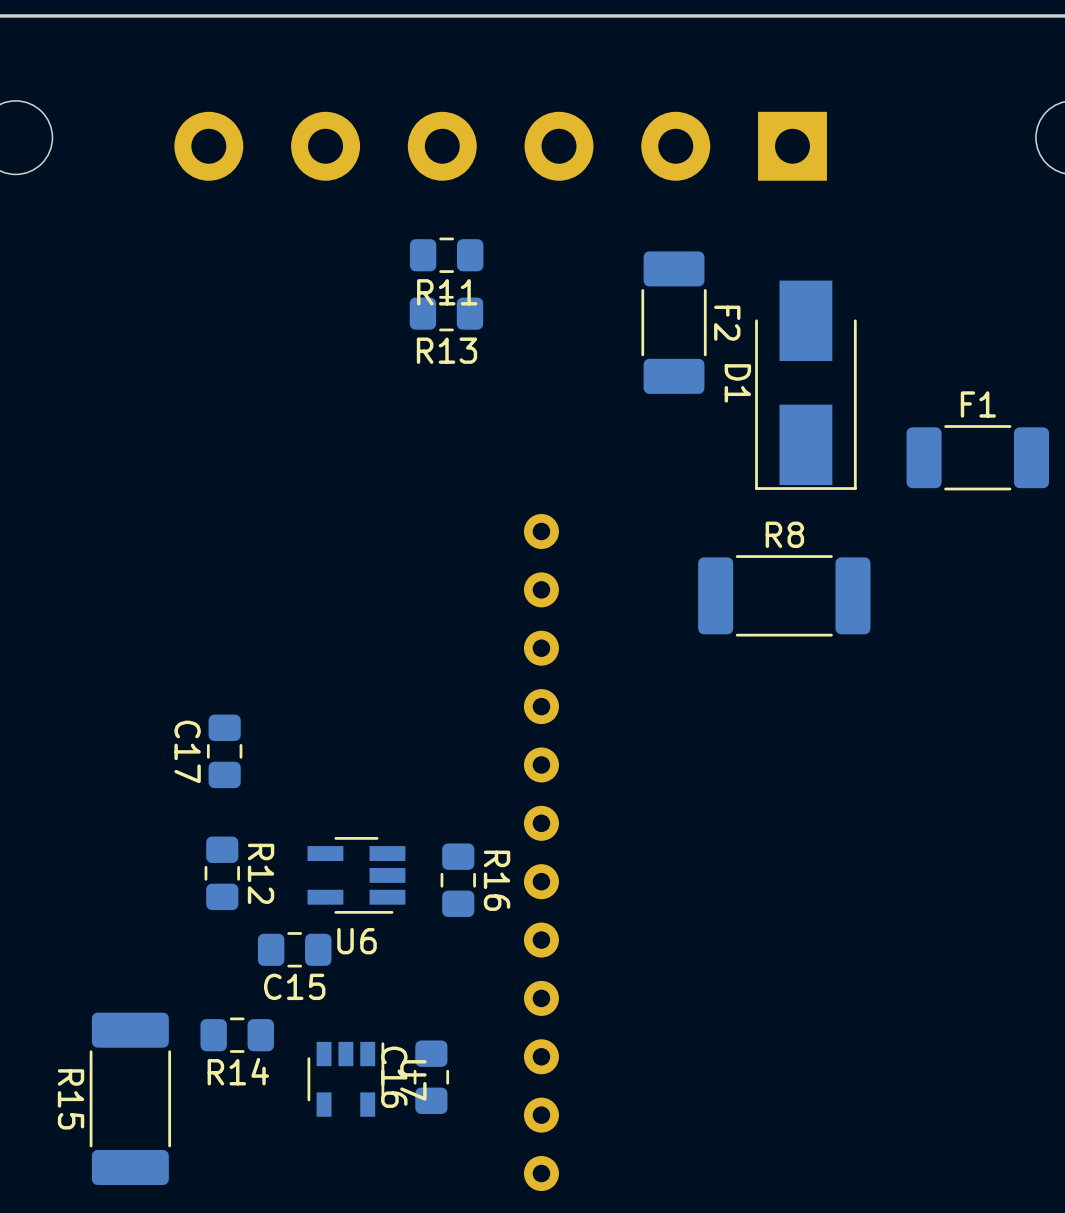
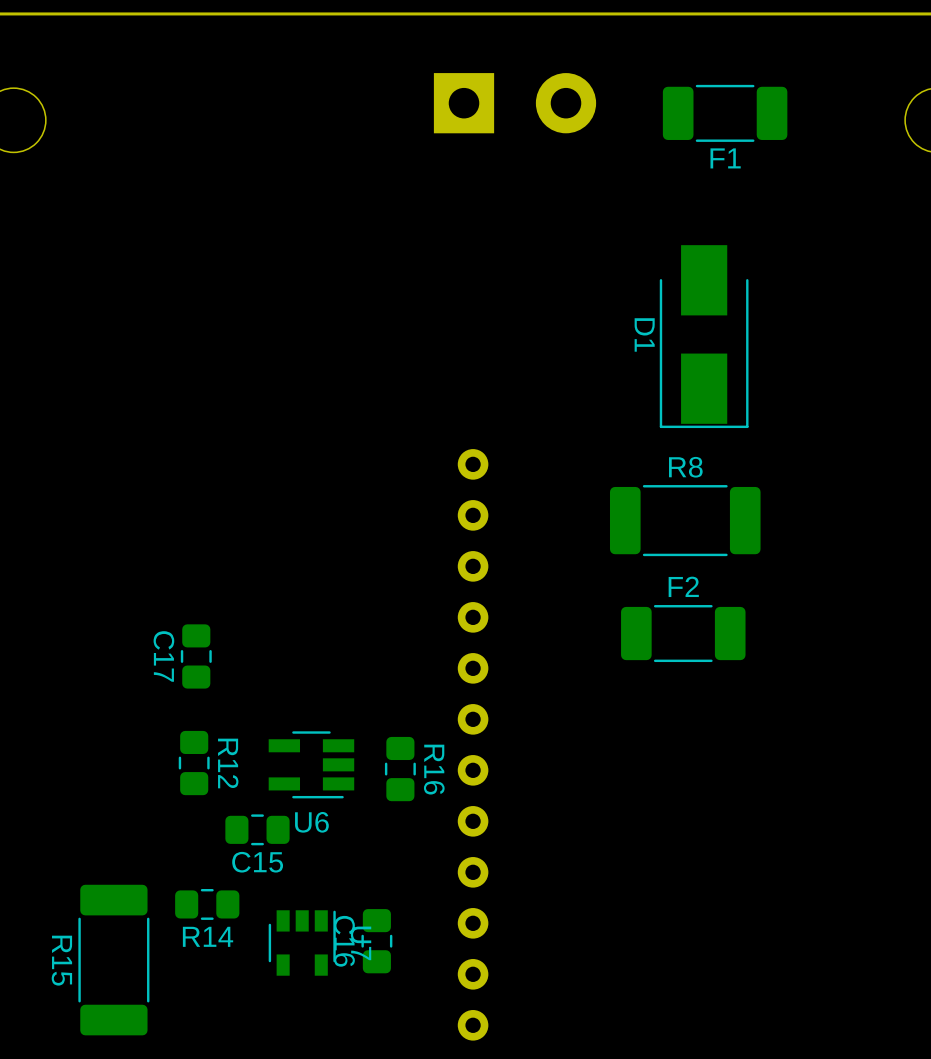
part: none -> (515, 103)
part: (500, 146) -> none
R11: (446, 255) -> none
R13: (446, 313) -> none
F2 rotation: 0° (674, 322) -> 90° clockwise (683, 633)
F2 position: (674, 322) -> (683, 633)
F2 name position: F2 (727, 323) -> F2 (683, 586)
F1 name position: F1 (978, 404) -> F1 (725, 158)
F1 position: (977, 457) -> (725, 113)

